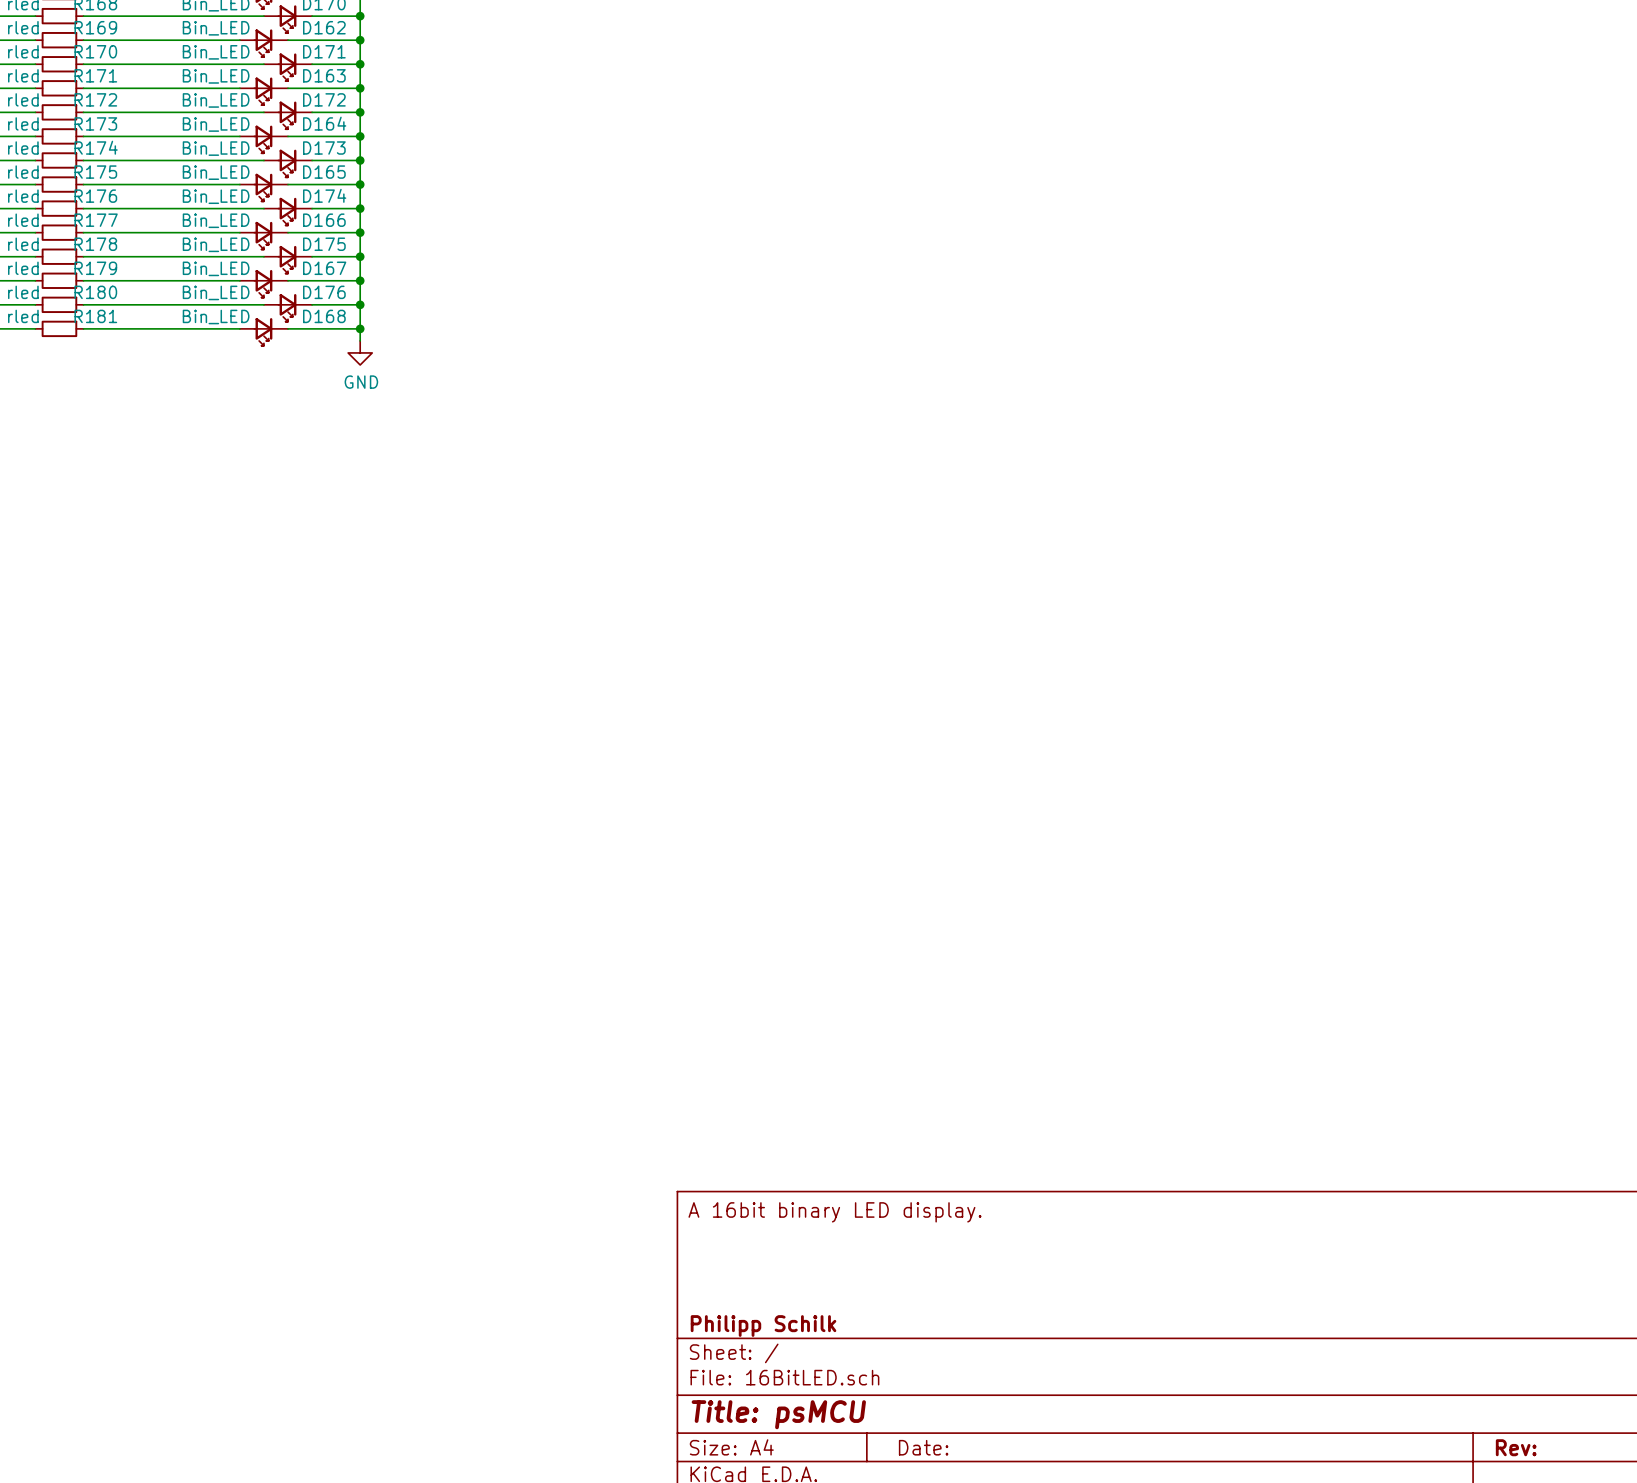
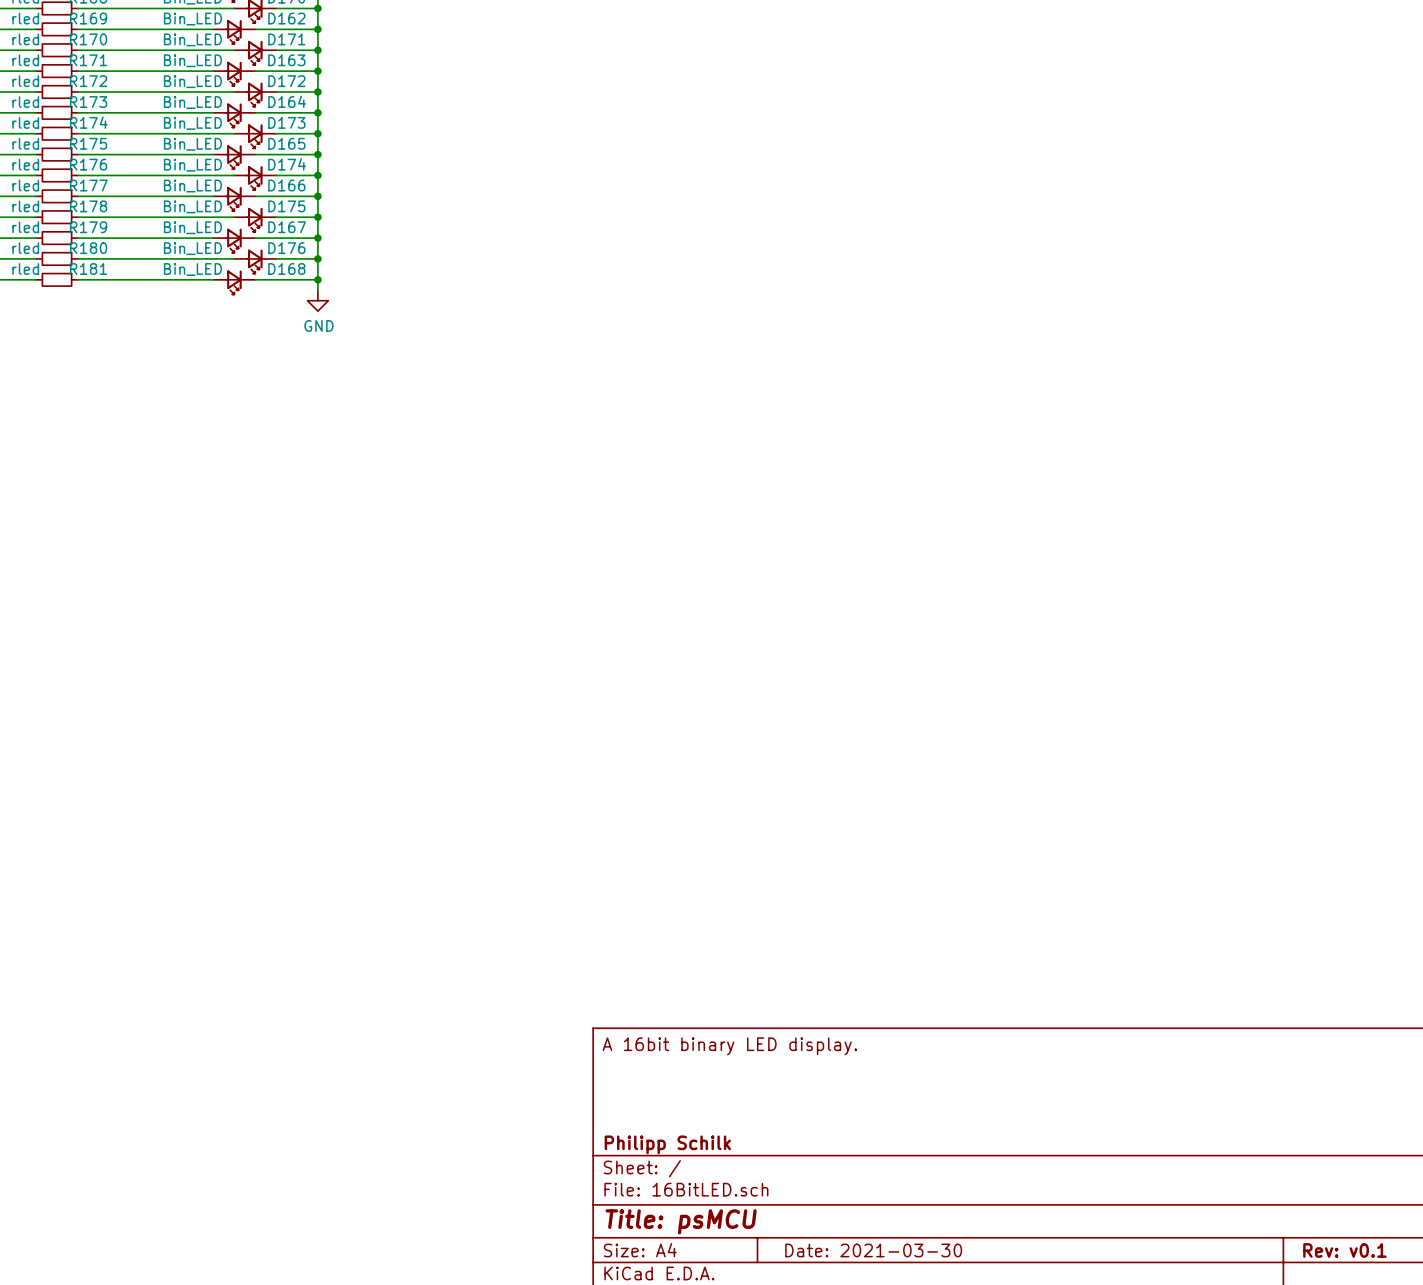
title block: Date: (923, 1447) -> Date: 2021-03-30 (873, 1250)
title block: Rev: (1516, 1447) -> Rev: v0.1 (1344, 1250)

